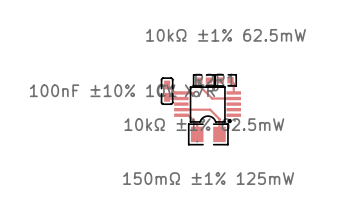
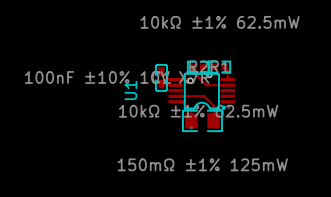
U1 name: none -> U1 (130, 90)

